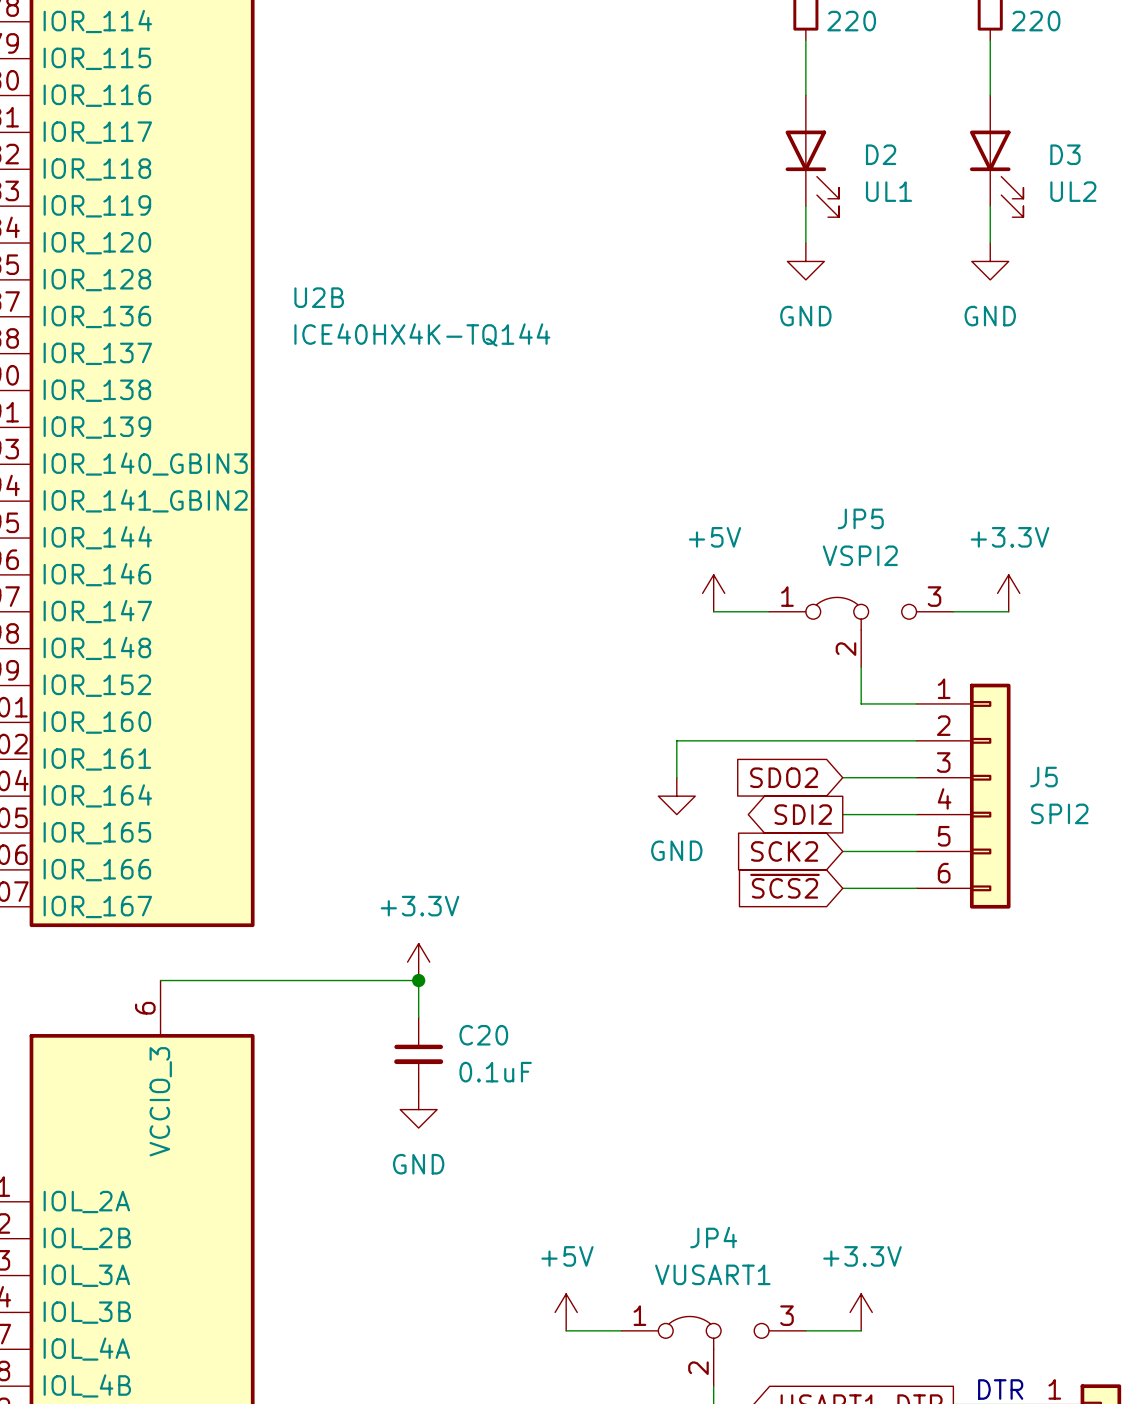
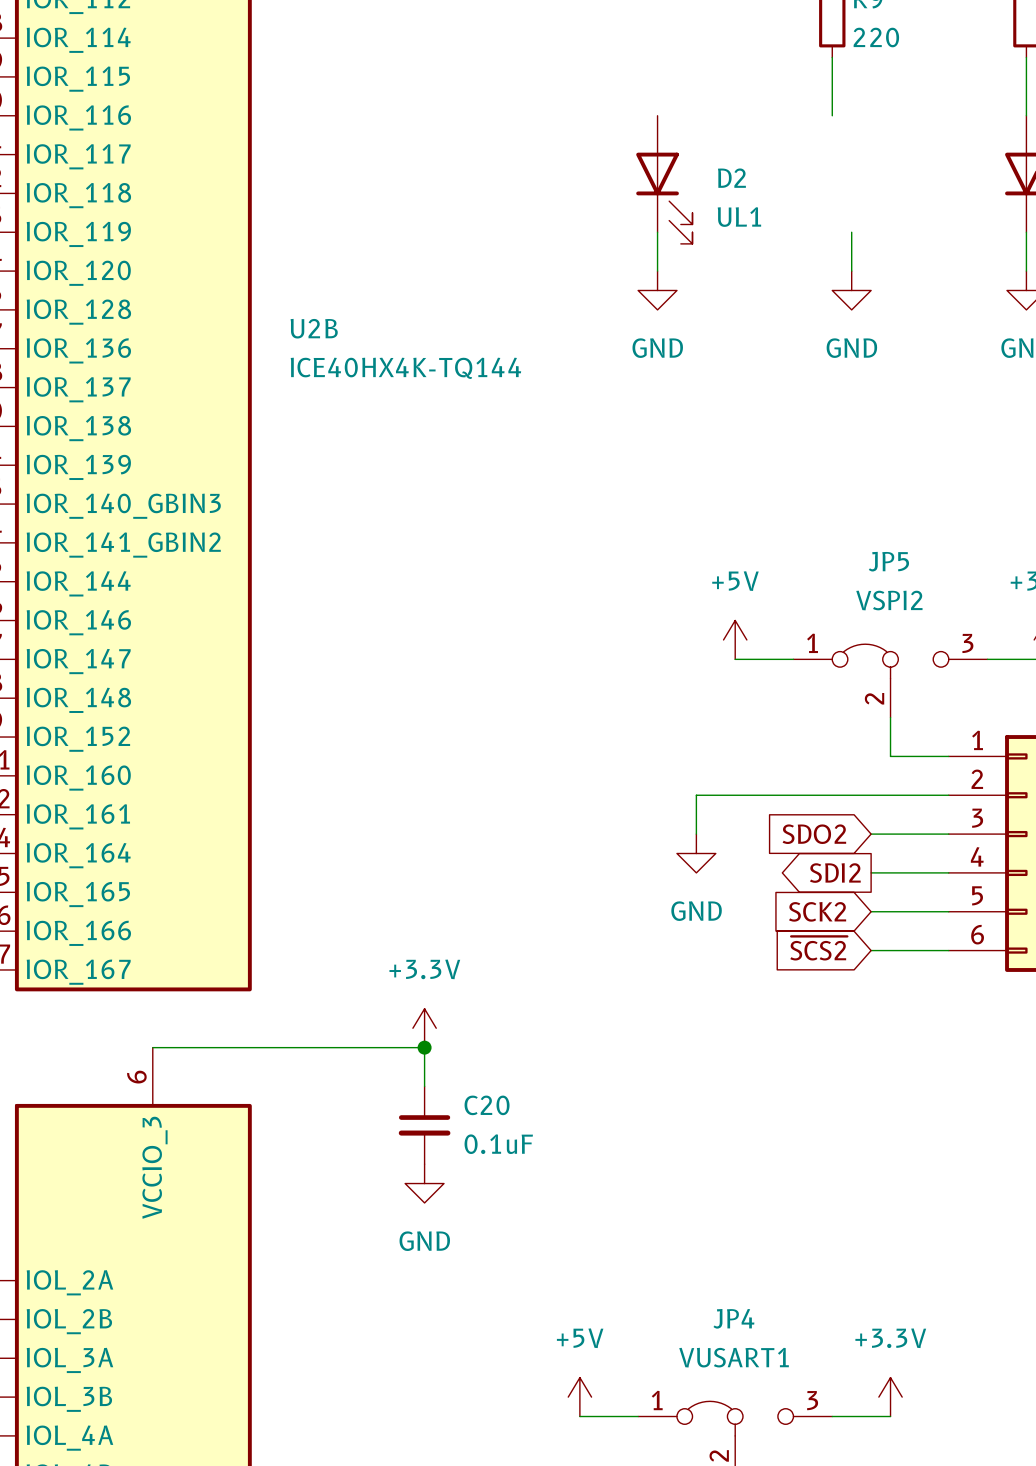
D2 position: (812, 156) -> (664, 179)
wire: none -> (657, 232) (657, 271)
wire: (805, 206) (805, 243) -> (851, 232) (851, 271)
power symbol: none -> GND (657, 290)
power symbol position: GND (805, 261) -> GND (851, 290)

